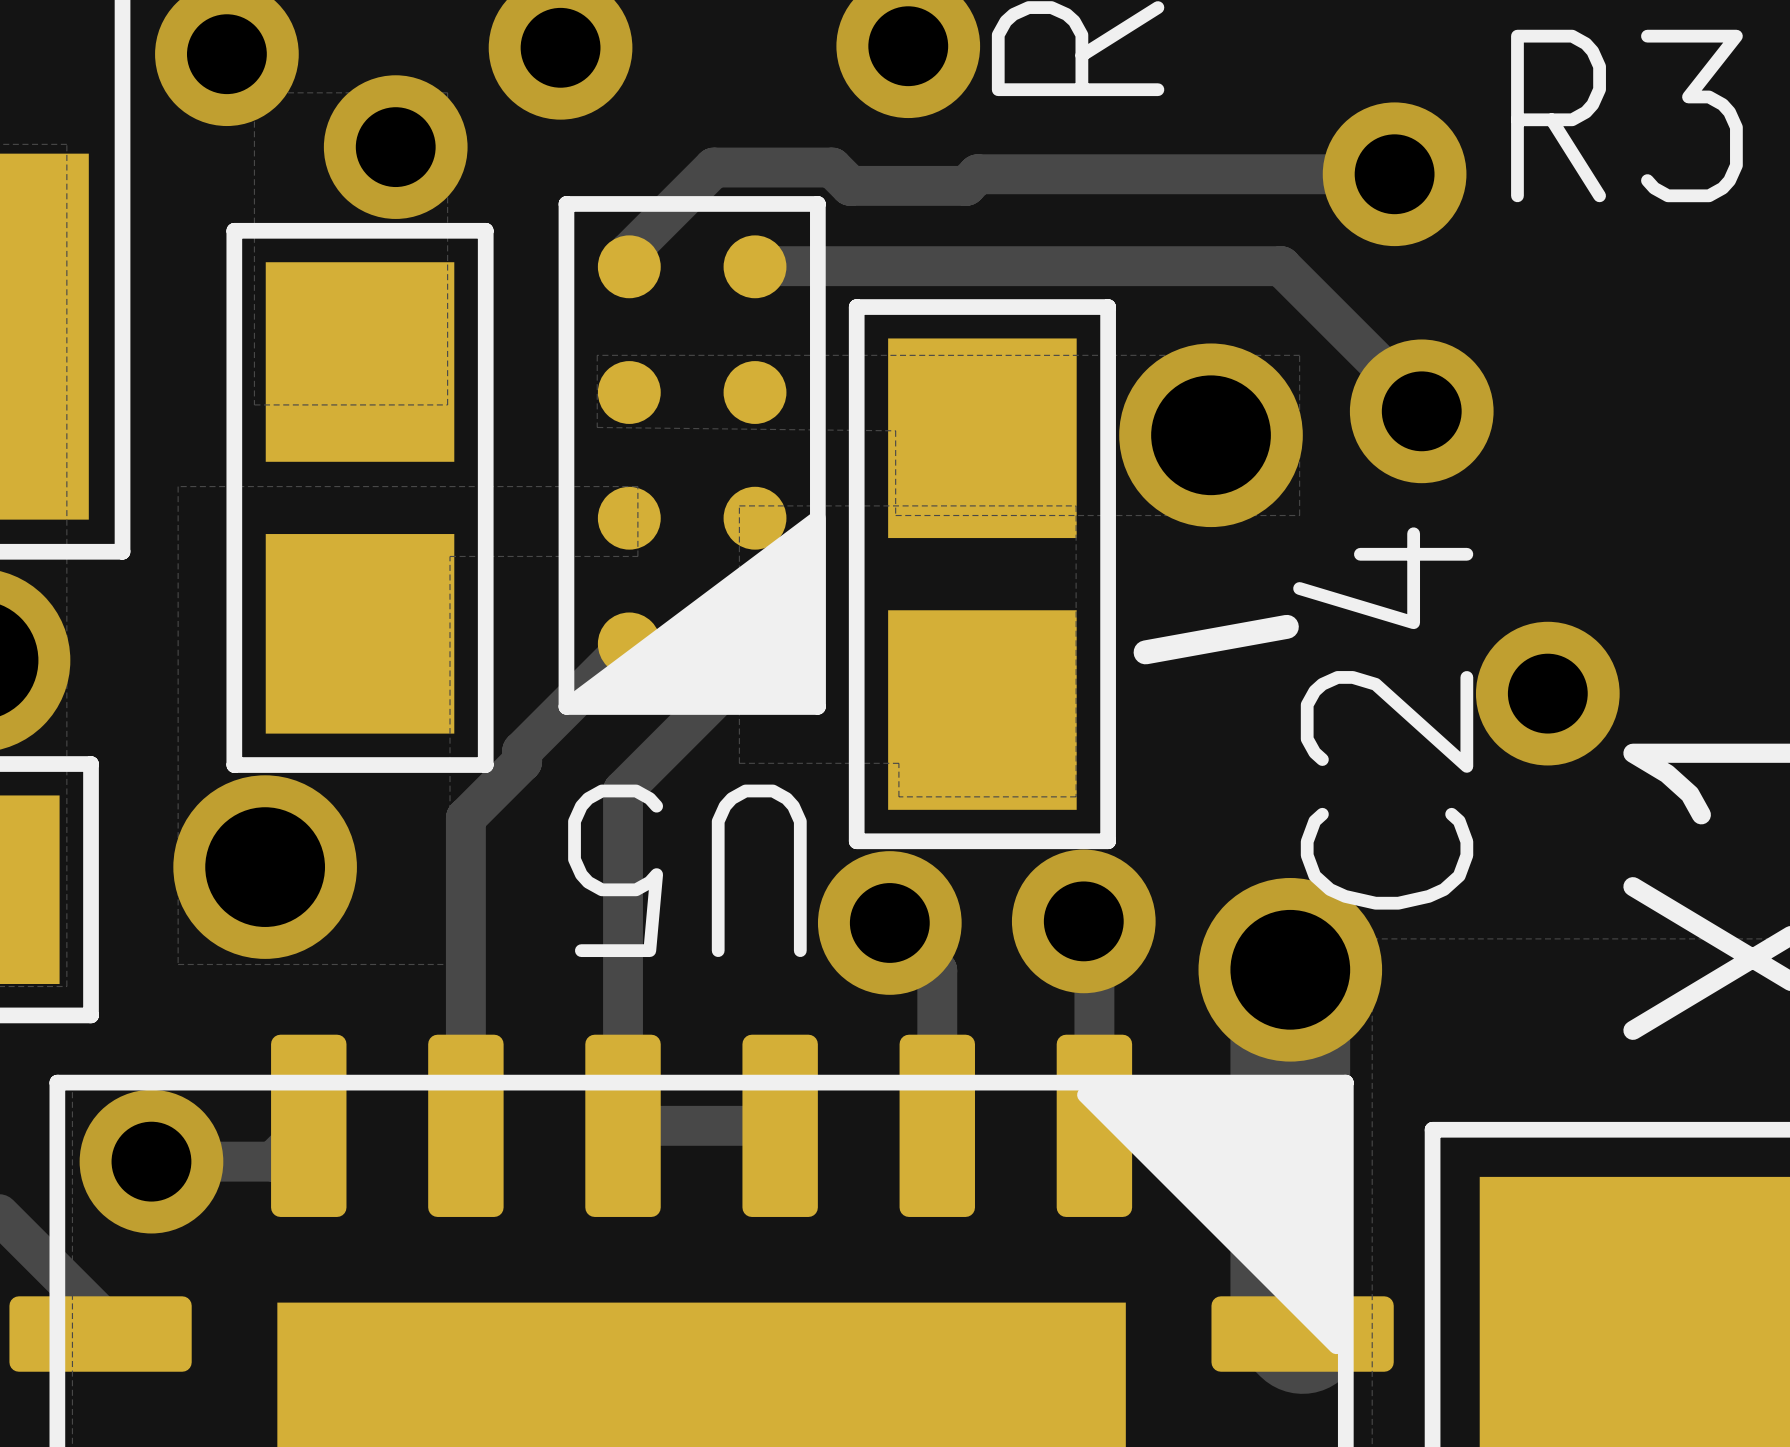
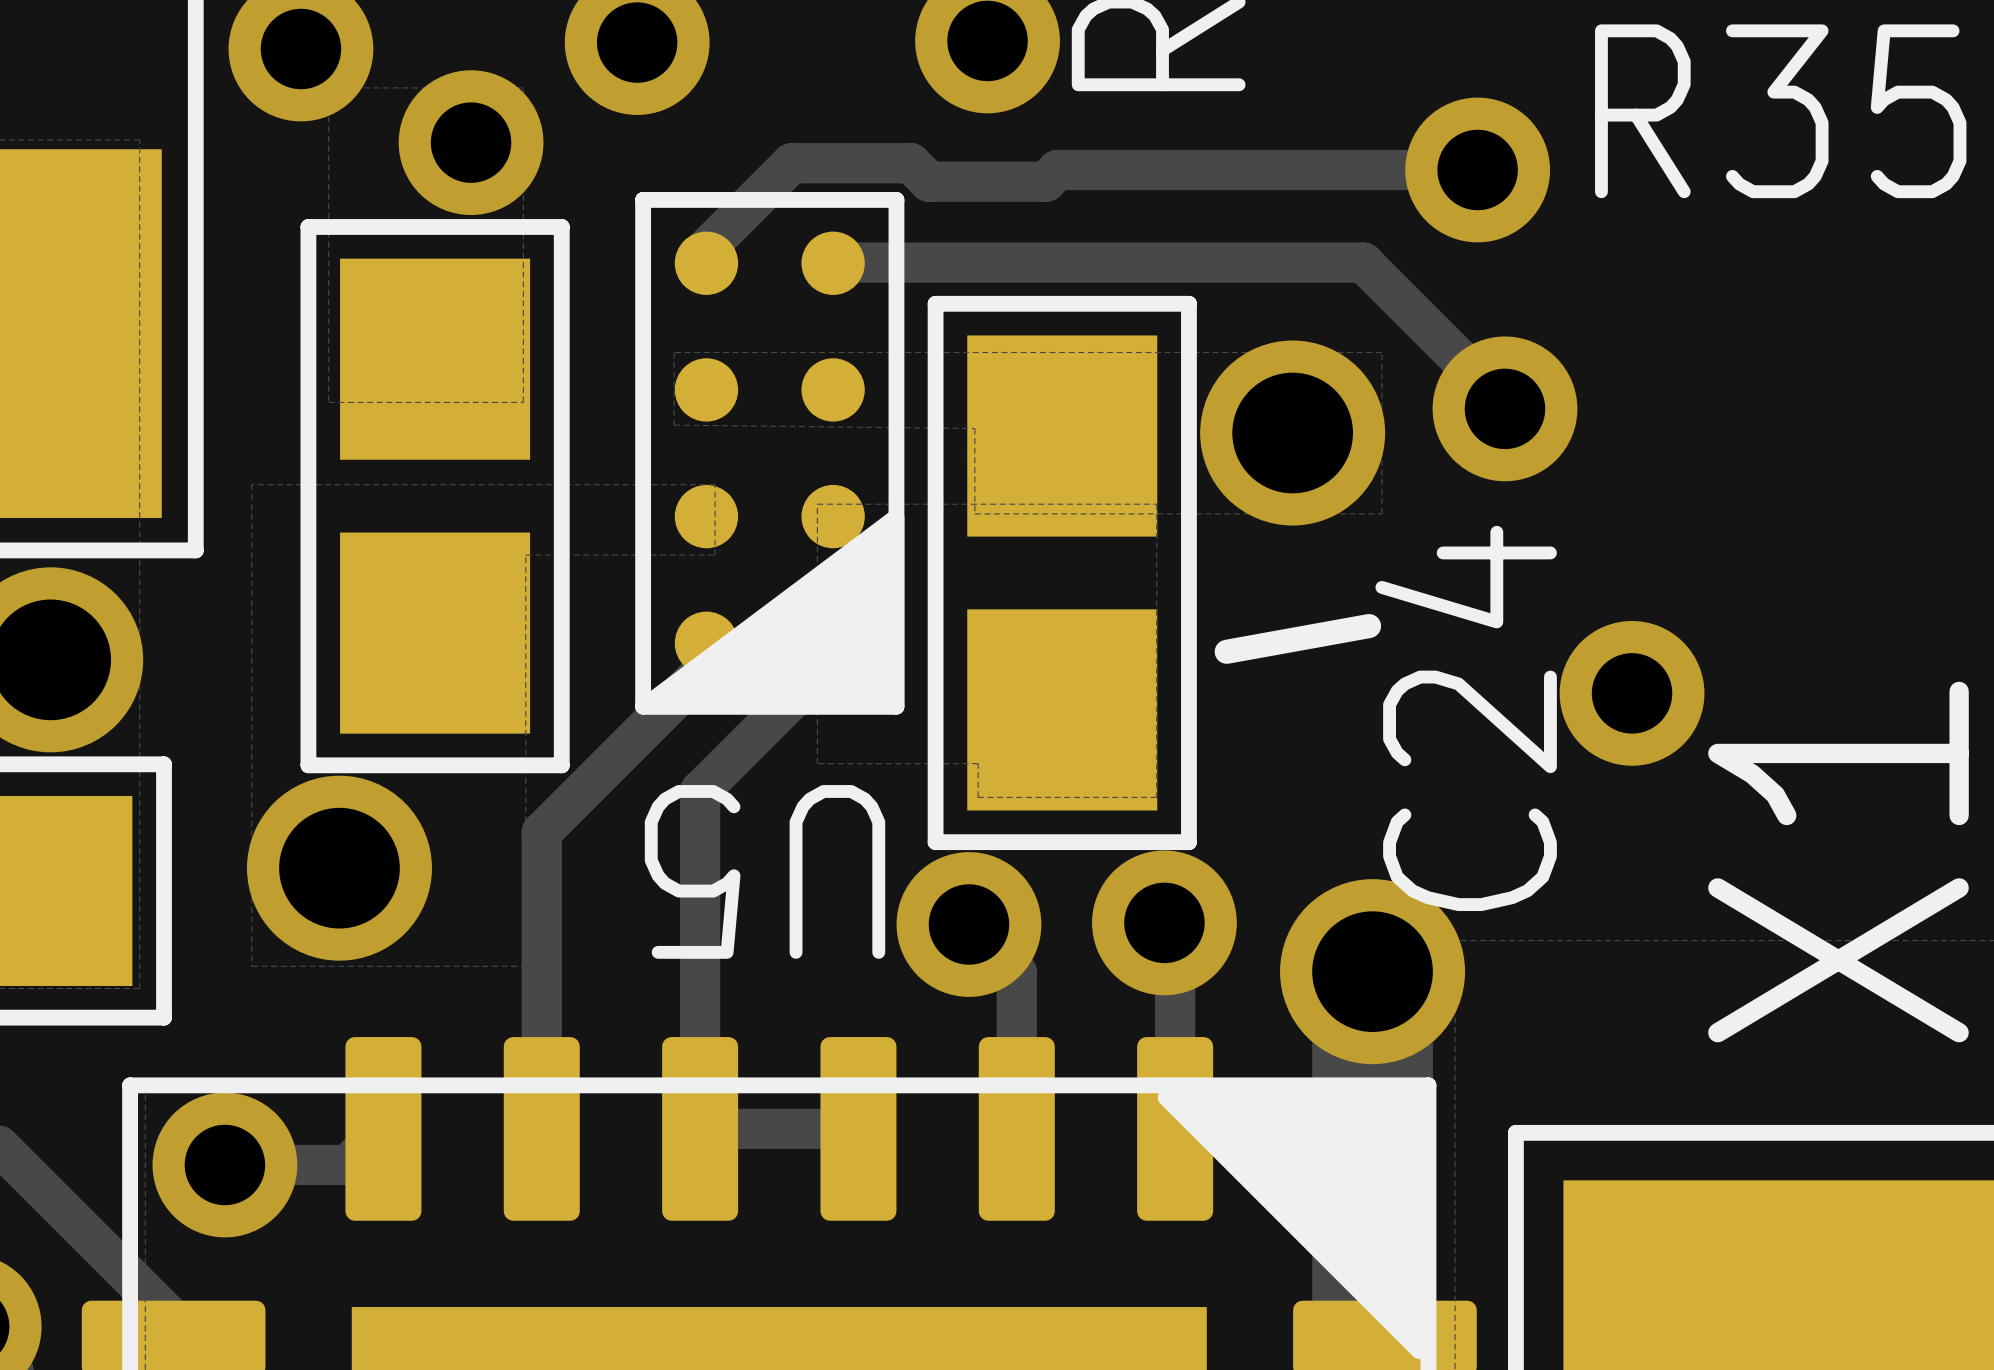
track: (629, 643) (522, 751) (522, 761) (465, 817) (465, 831) -> (706, 643) (706, 667) (541, 832)

